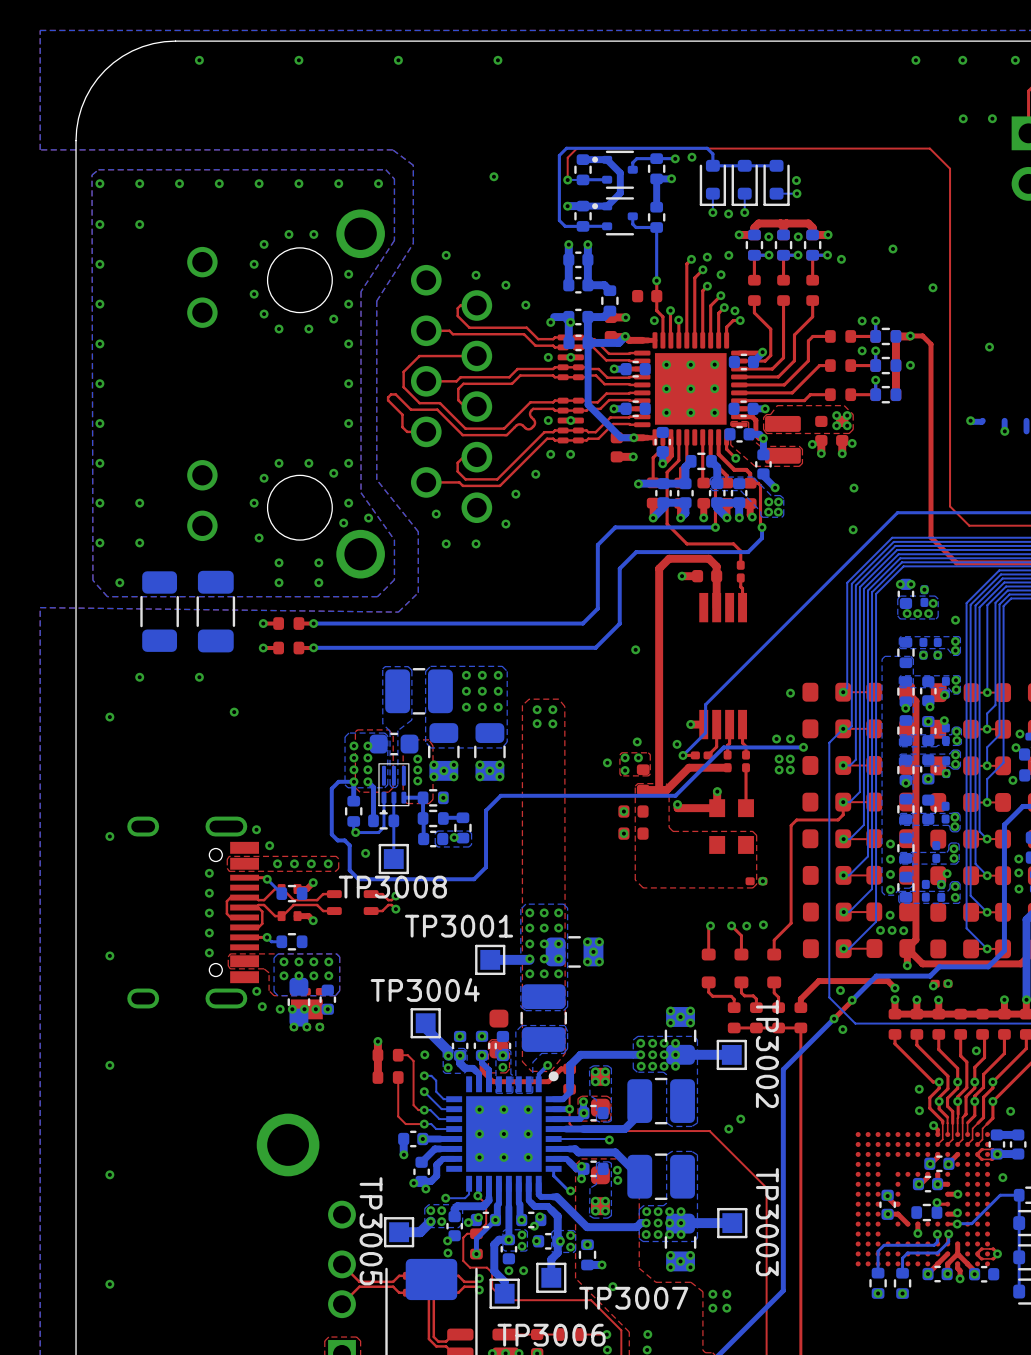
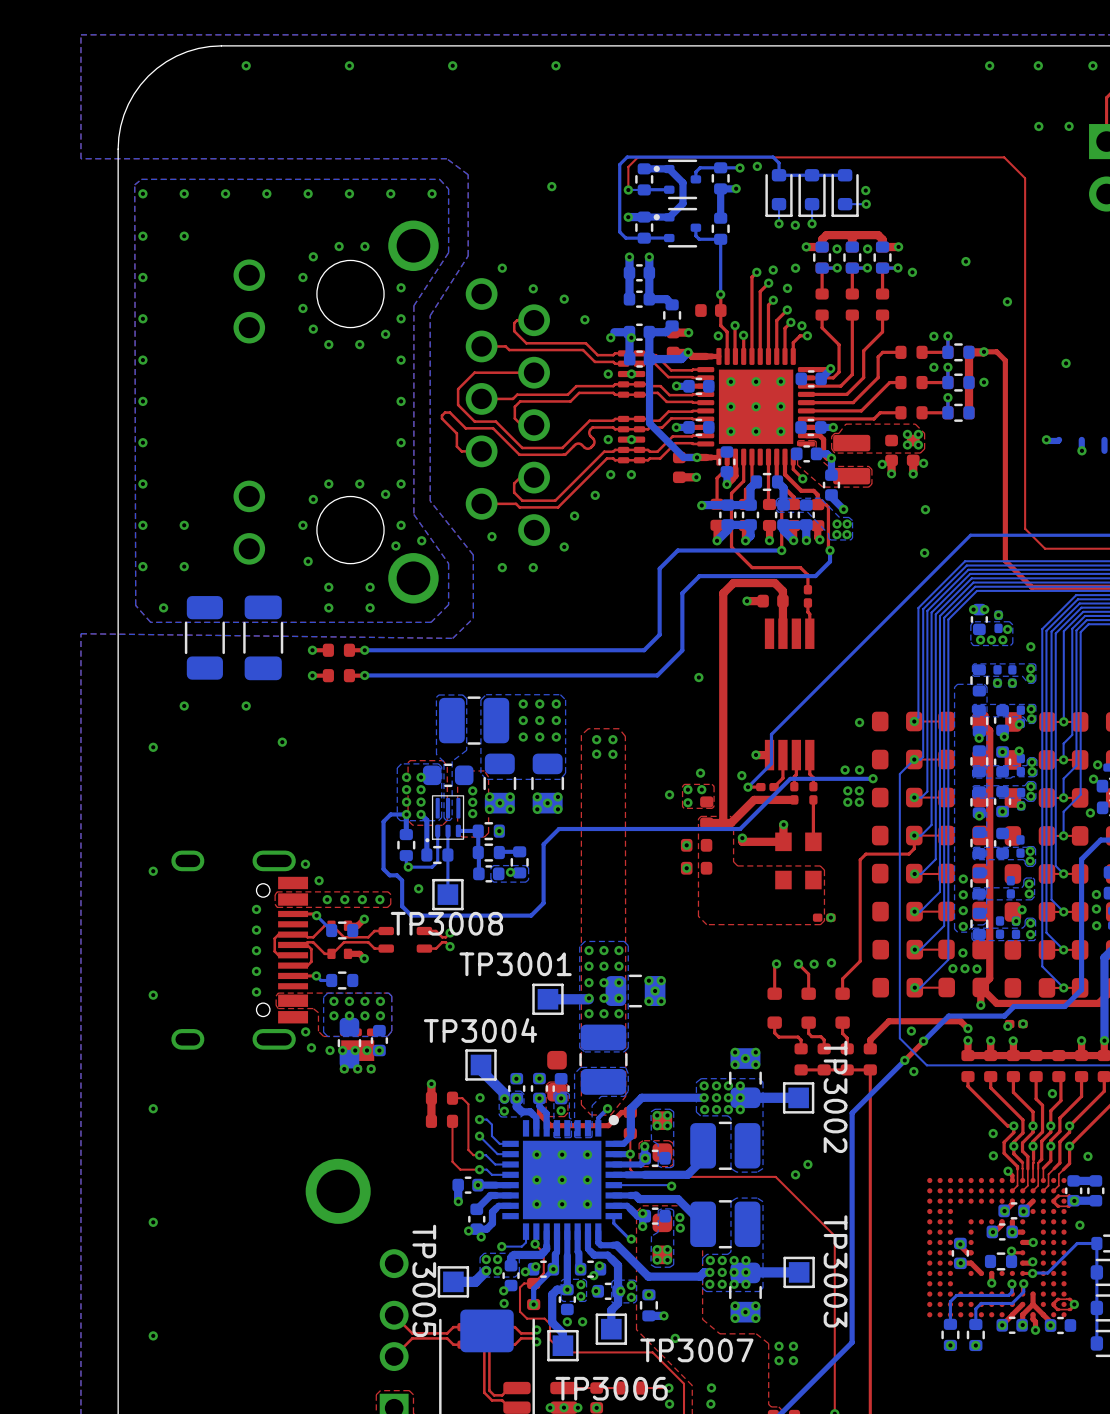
part footprint: [378, 763, 410, 814] -> [425, 795, 465, 843]

